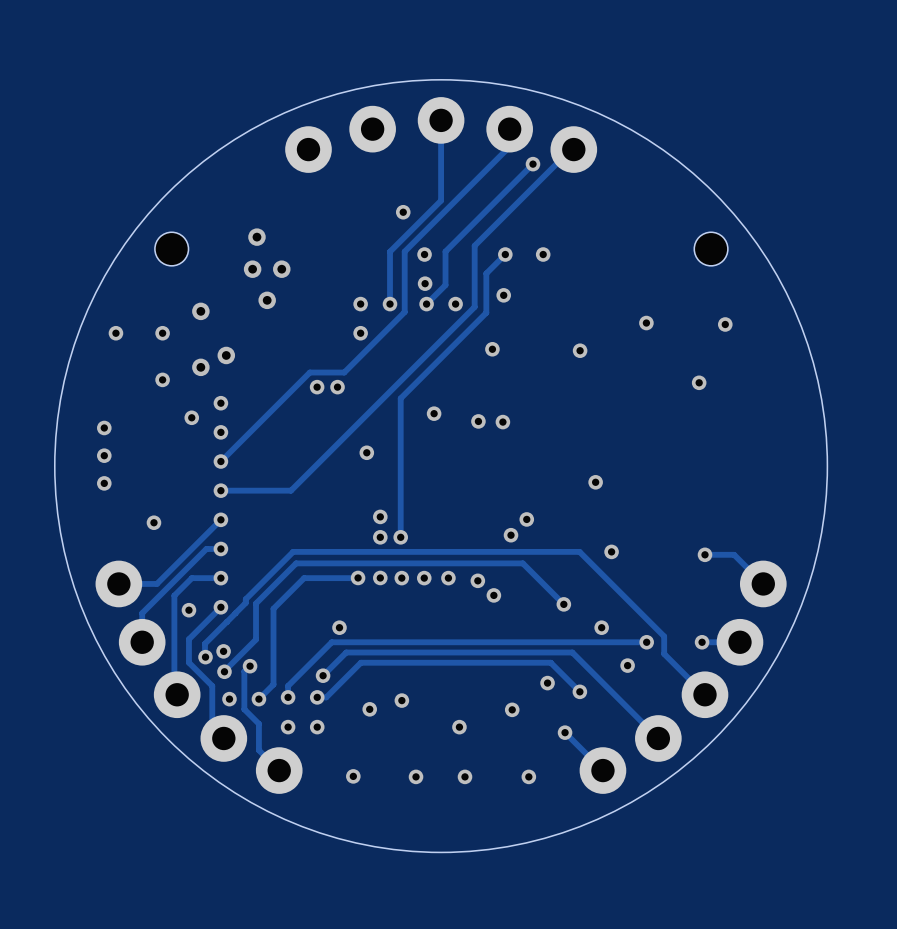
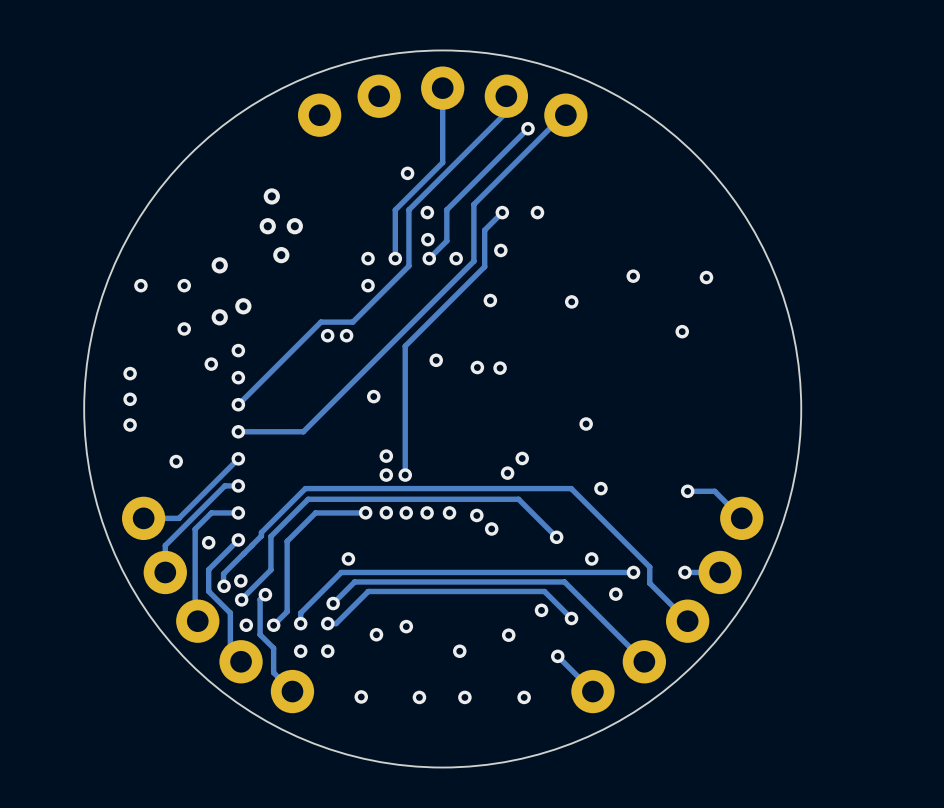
part: (171, 249) -> none
part: (711, 249) -> none

